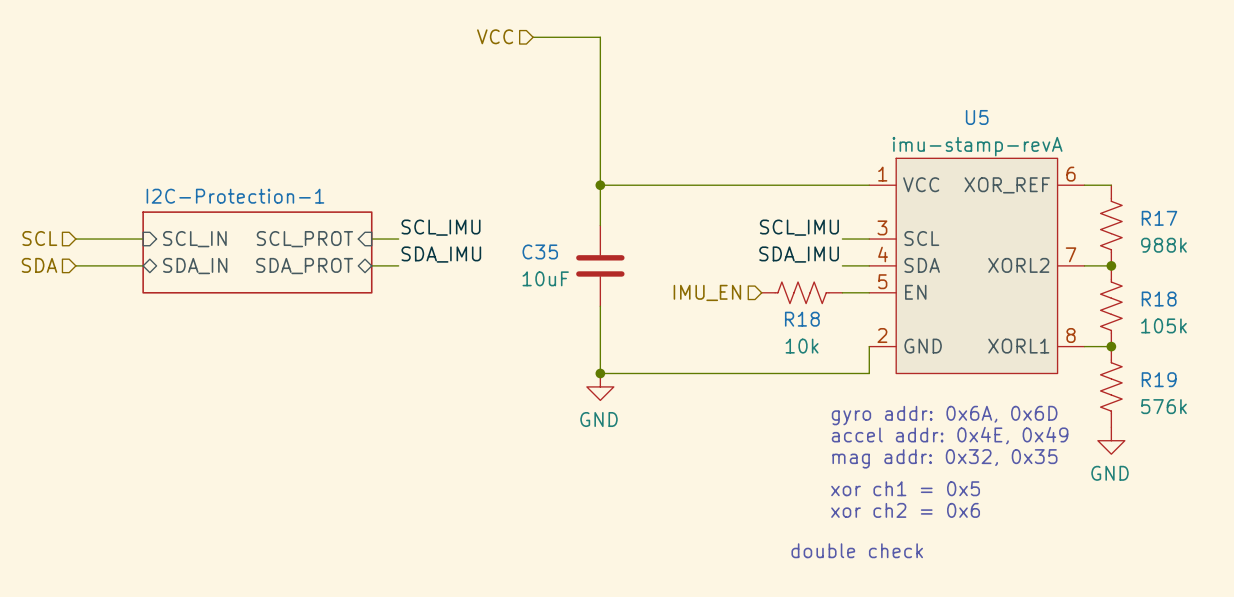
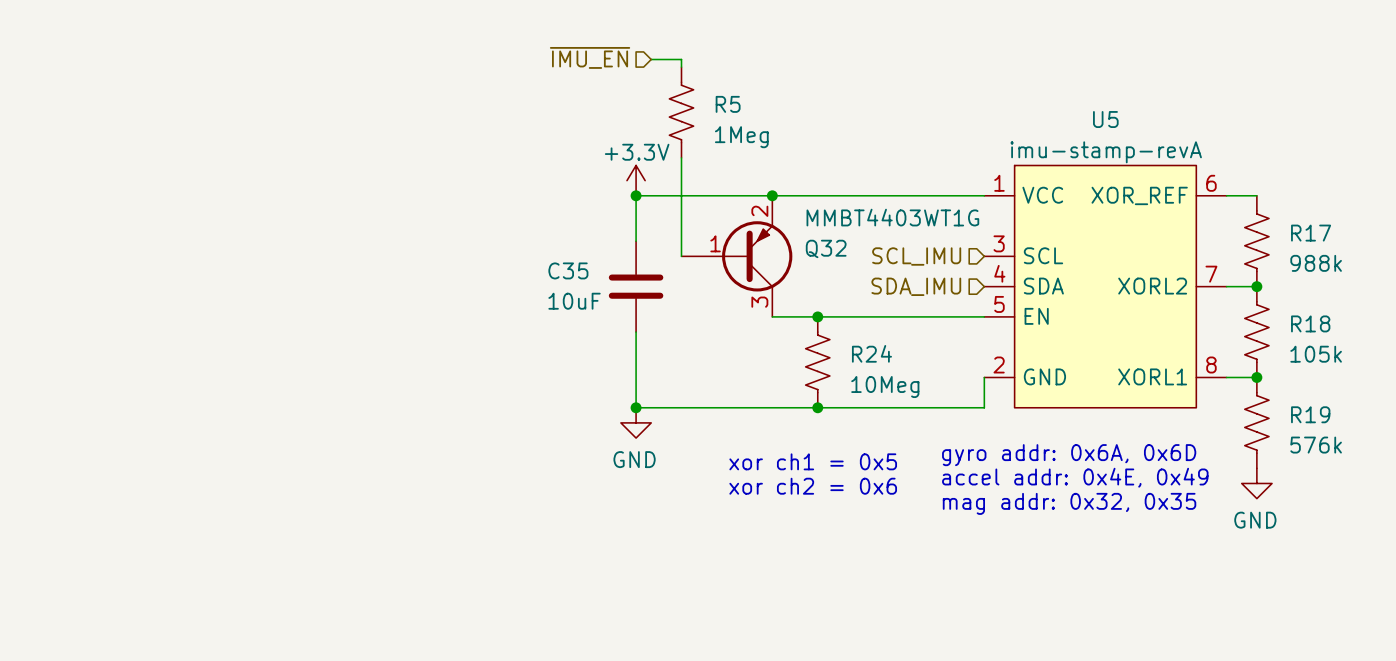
hierarchical label: VCC (495, 36) -> none
wire: (533, 37) (600, 37) (600, 64) -> (651, 59) (681, 59)
hierarchical label: none -> ~{IMU_EN} (590, 57)
R5: none -> 1Meg (681, 112)
power symbol: none -> +3.3V (636, 180)
junction: none -> (636, 195)
wire: none -> (681, 195) (636, 195) (636, 241)
junction: (600, 185) -> none
junction: none -> (772, 195)
label: SCL_IMU (441, 227) -> none
label: SCL_IMU (799, 227) -> none
hierarchical label: SCL (39, 238) -> none
wire: (75, 239) (143, 239) -> none
sheet pin: SCL_IN (194, 239) -> none
sheet pin: SCL_PROT (304, 239) -> none
wire: (371, 239) (398, 239) -> none
Q32: none -> MMBT4403WT1G (736, 256)
hierarchical label: none -> SCL_IMU (916, 256)
wire: (842, 239) (869, 239) -> none
sheet I2C-Protection-1: (257, 252) -> none
label: SDA_IMU (441, 254) -> none
label: SDA_IMU (799, 254) -> none
hierarchical label: SDA (39, 265) -> none
wire: (75, 265) (143, 265) -> none
wire: (371, 265) (398, 265) -> none
C35 position: (600, 265) -> (636, 286)
wire: (842, 265) (869, 265) -> none
sheet pin: SDA_IN (195, 266) -> none
sheet pin: SDA_PROT (304, 266) -> none
hierarchical label: none -> SDA_IMU (916, 286)
wire: none -> (772, 316) (954, 316)
hierarchical label: IMU_EN (707, 292) -> none
junction: none -> (817, 316)
R18: 10k (802, 292) -> none
wire: (600, 306) (600, 373) -> (636, 332) (636, 407) (681, 407)
R24: none -> 10Meg (817, 362)
junction position: (600, 373) -> (636, 407)
junction: none -> (817, 407)
power symbol position: GND (600, 386) -> GND (636, 422)
text position: xor ch1 = 0x5 (905, 488) -> xor ch1 = 0x5 (813, 461)
text position: xor ch2 = 0x6 (905, 510) -> xor ch2 = 0x6 (813, 486)
text: double check (857, 550) -> none

